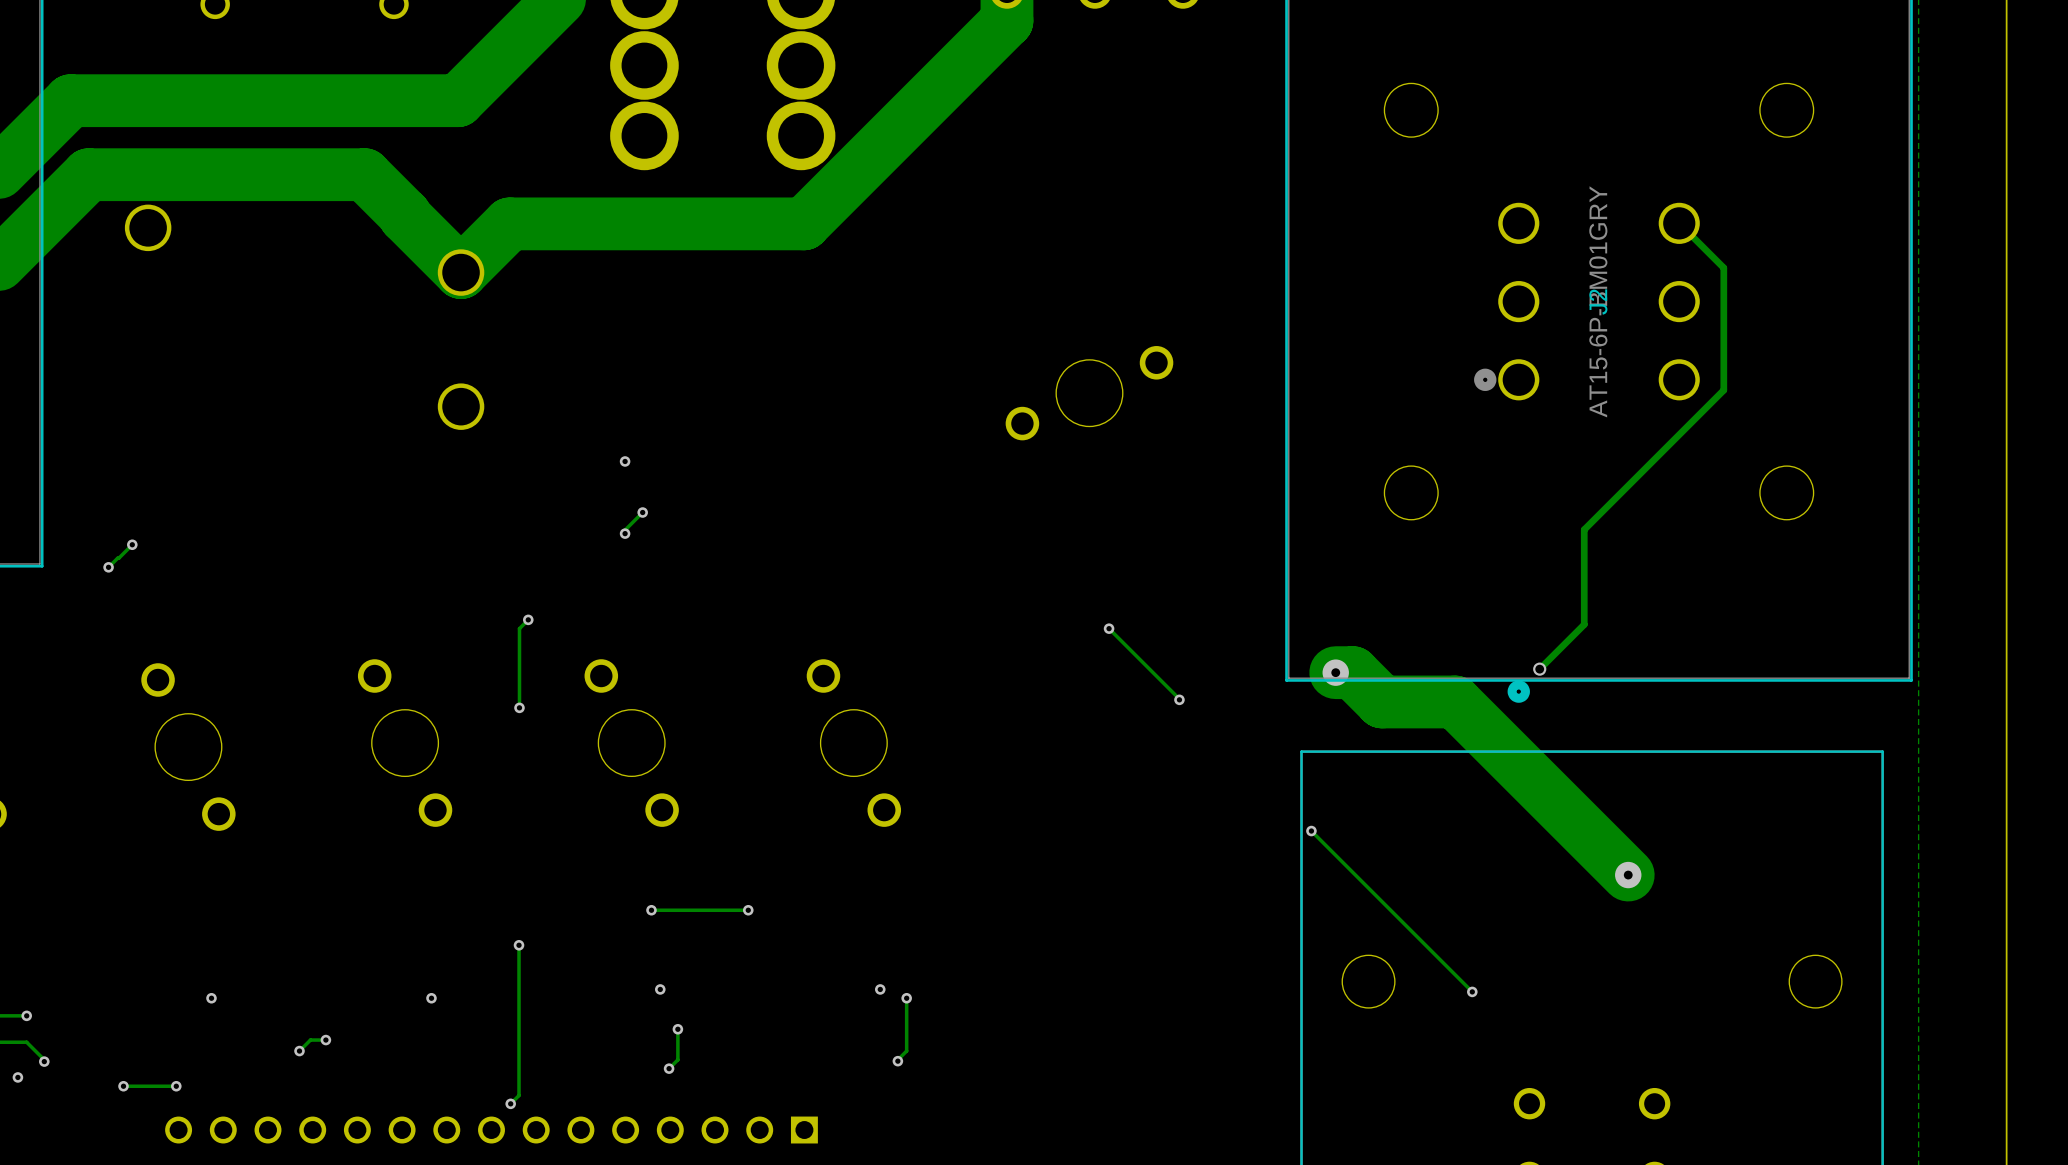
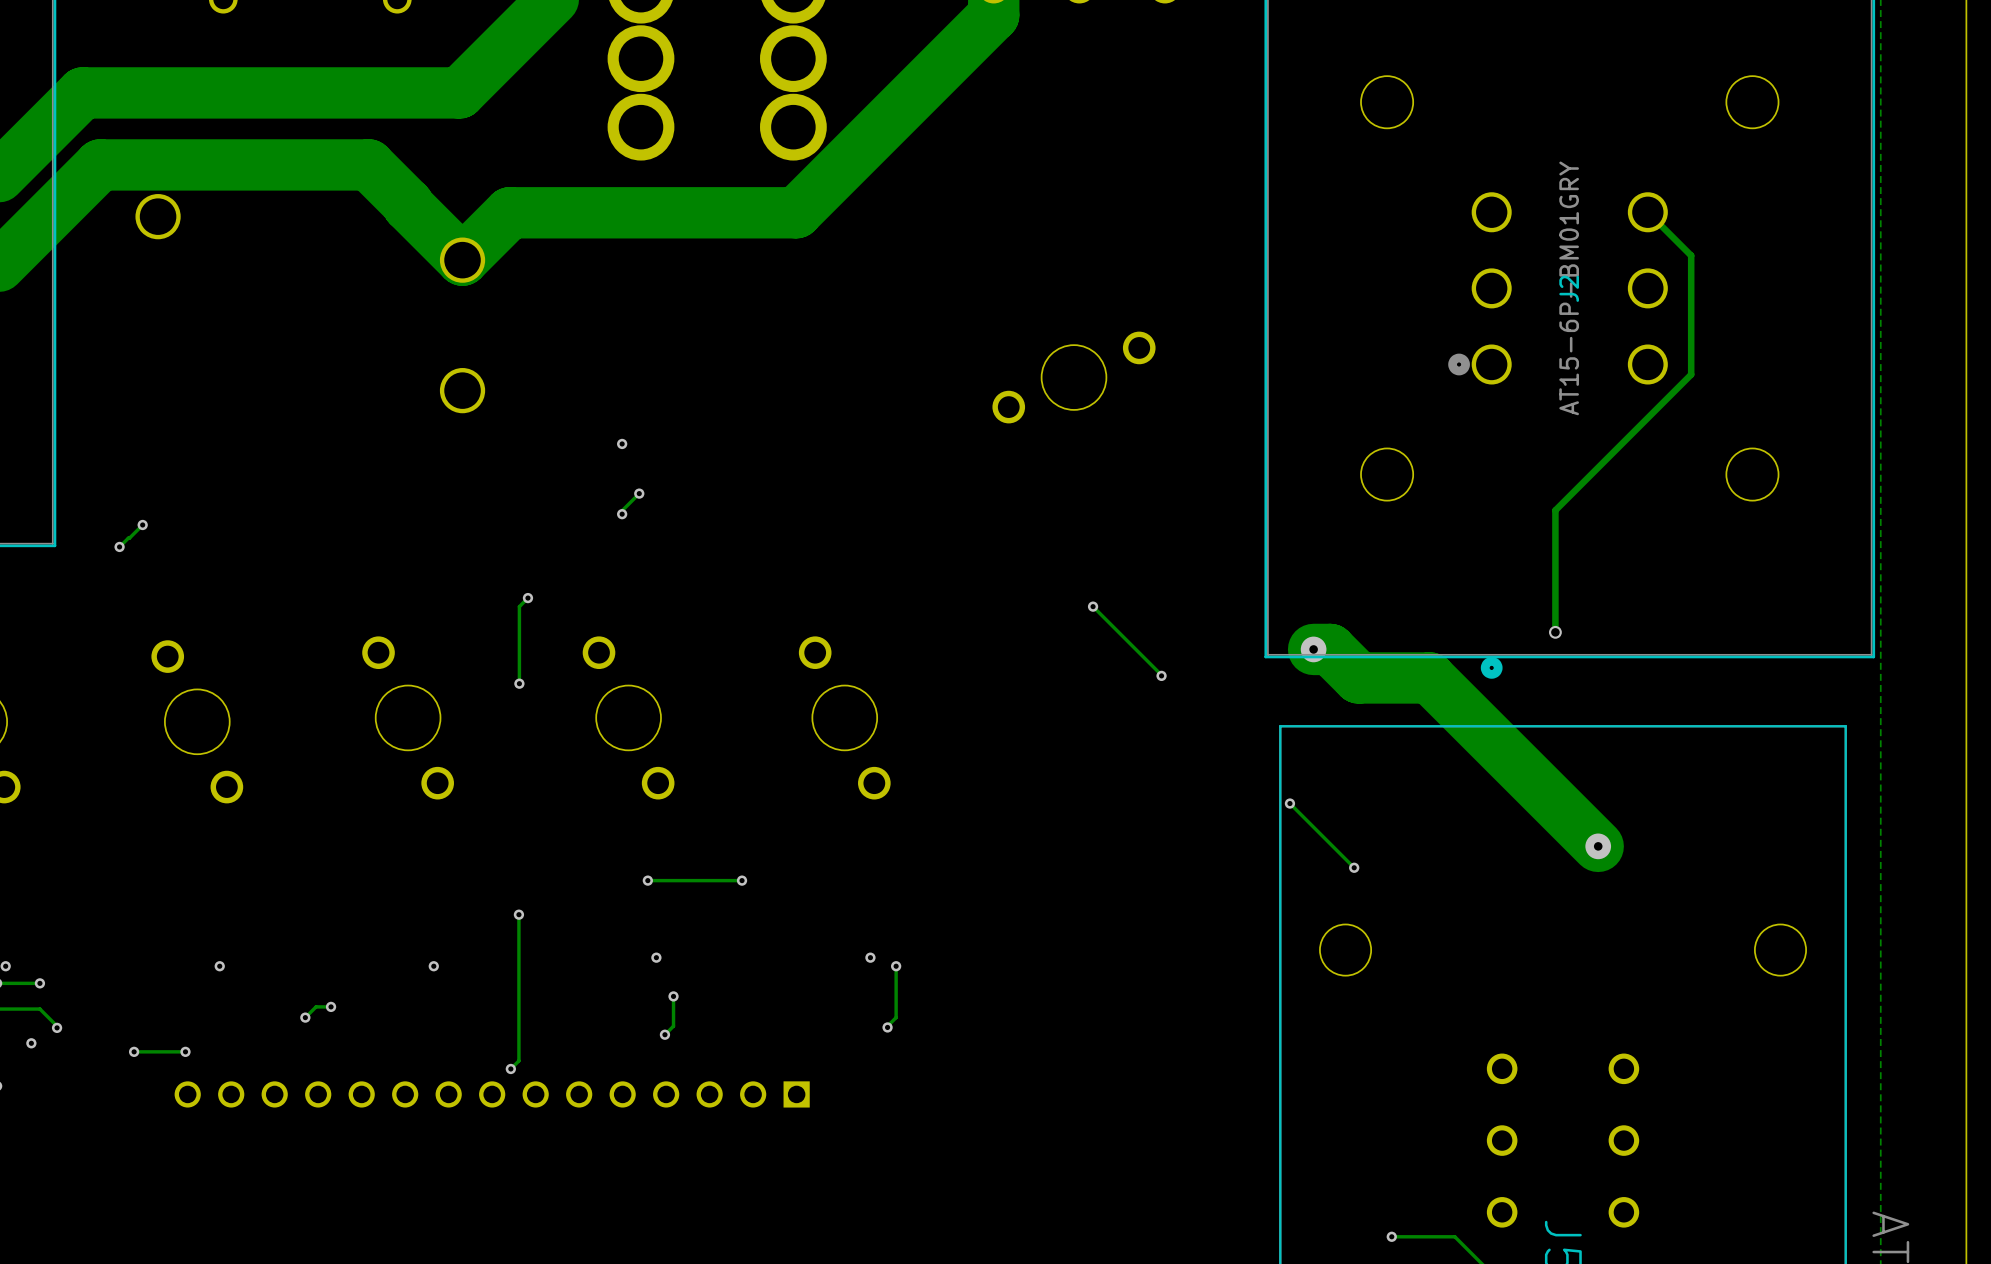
track: (1584, 624) (1539, 669) -> (1555, 602) (1555, 632)
via position: (1539, 669) -> (1555, 632)
track: (1377, 897) (1472, 991) -> none
via: none -> (1354, 867)
via: (1472, 991) -> none

